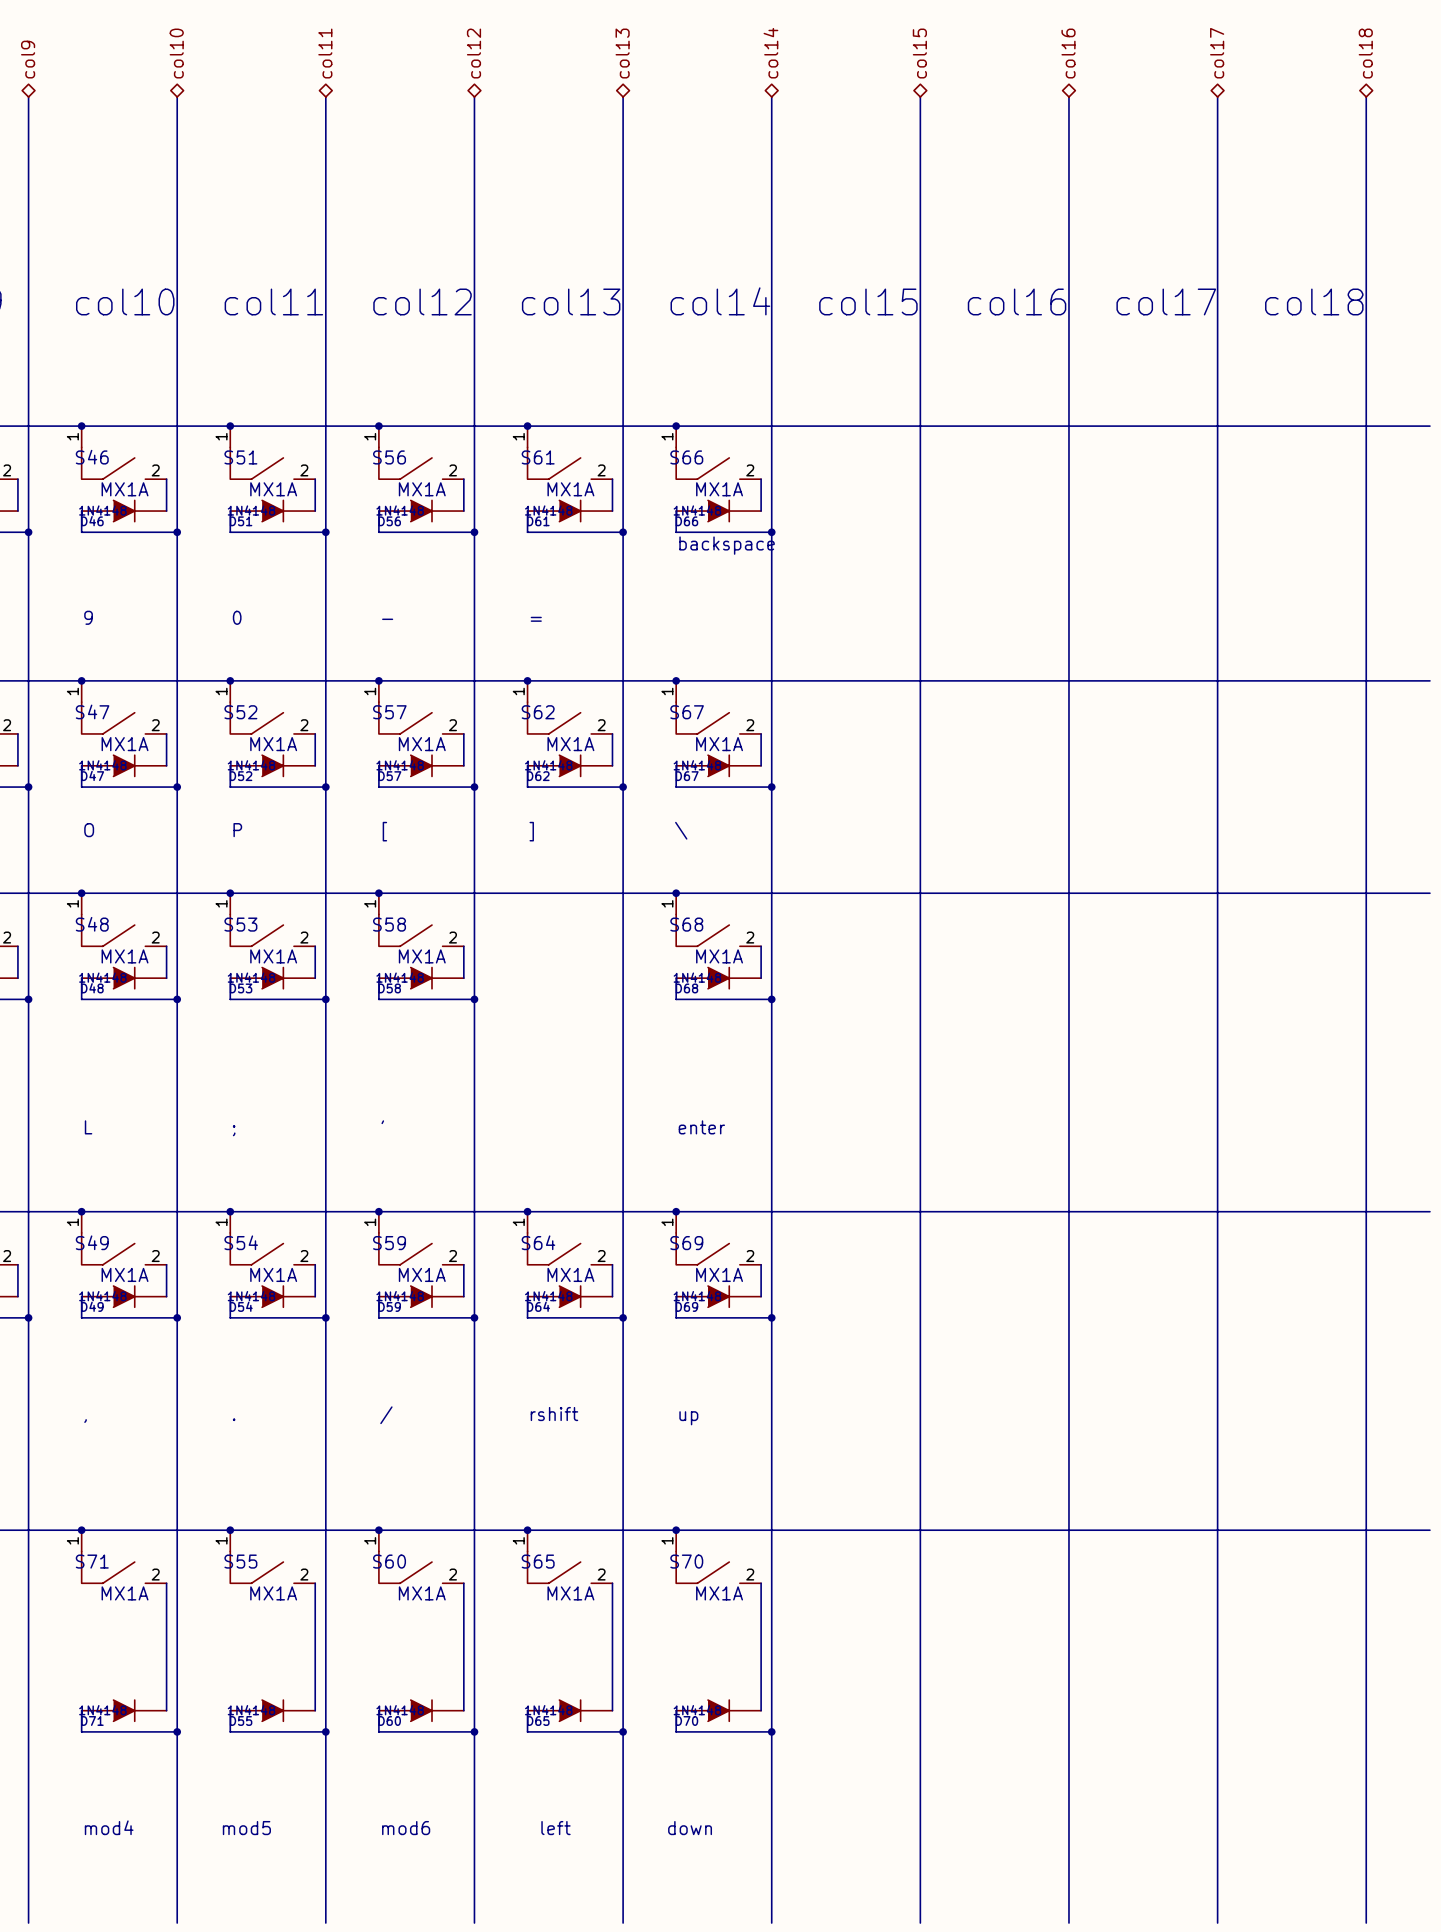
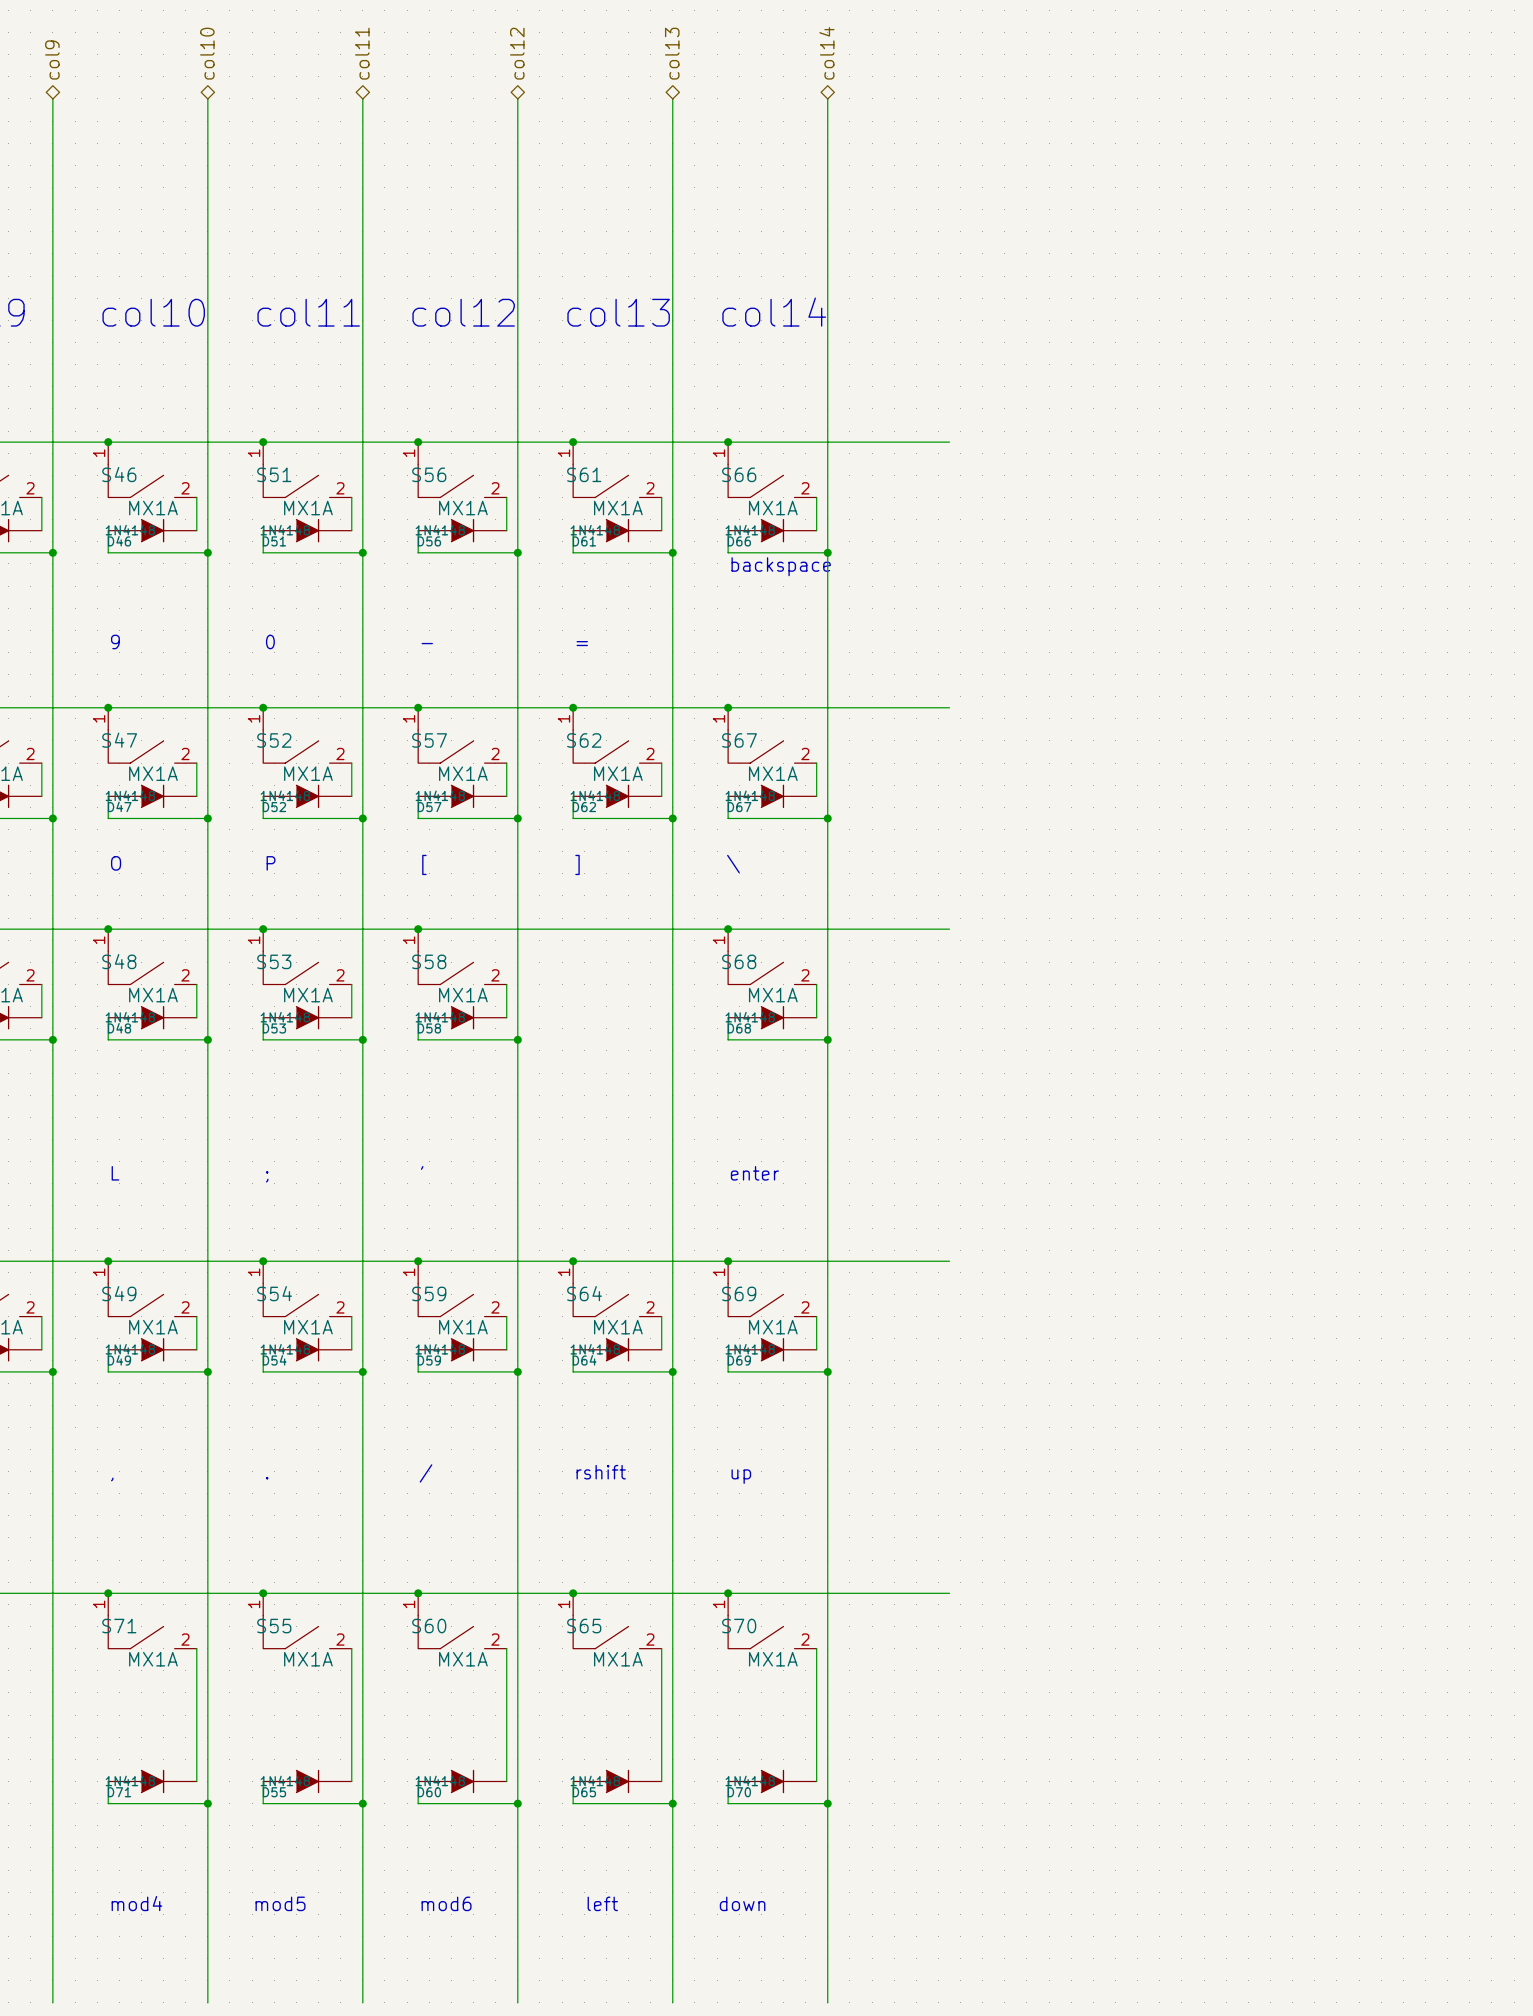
hierarchical label: col15 (919, 53) -> none
hierarchical label: col16 (1068, 53) -> none
hierarchical label: col17 (1217, 53) -> none
hierarchical label: col18 (1365, 53) -> none
wire: (920, 96) (920, 1923) -> none
wire: (1068, 96) (1068, 1923) -> none
wire: (1217, 96) (1217, 1923) -> none
wire: (1366, 96) (1366, 1923) -> none
text: col15 (868, 301) -> none
text: col16 (1017, 301) -> none
text: col17 (1166, 301) -> none
text: col18 (1314, 301) -> none
wire: (888, 426) (1429, 426) -> none
wire: (888, 680) (1429, 680) -> none
wire: (888, 893) (1429, 893) -> none
wire: (888, 1211) (1429, 1211) -> none
wire: (888, 1530) (1429, 1530) -> none

